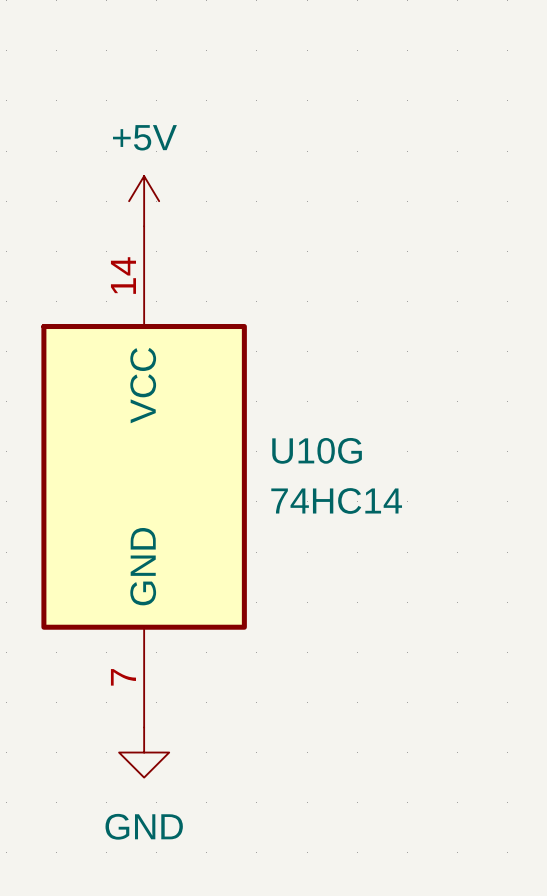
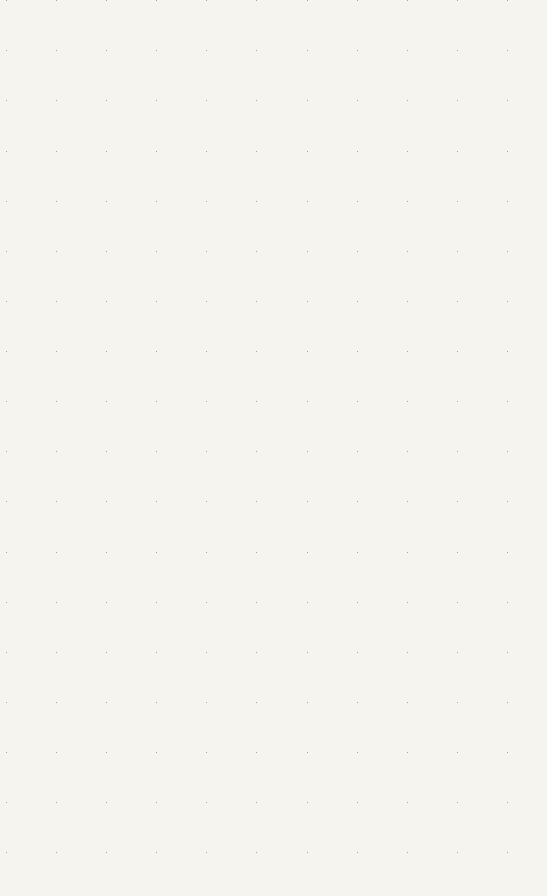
power symbol: +5V (144, 201) -> none
U10G: 74HC14 (144, 476) -> none
power symbol: GND (144, 752) -> none

